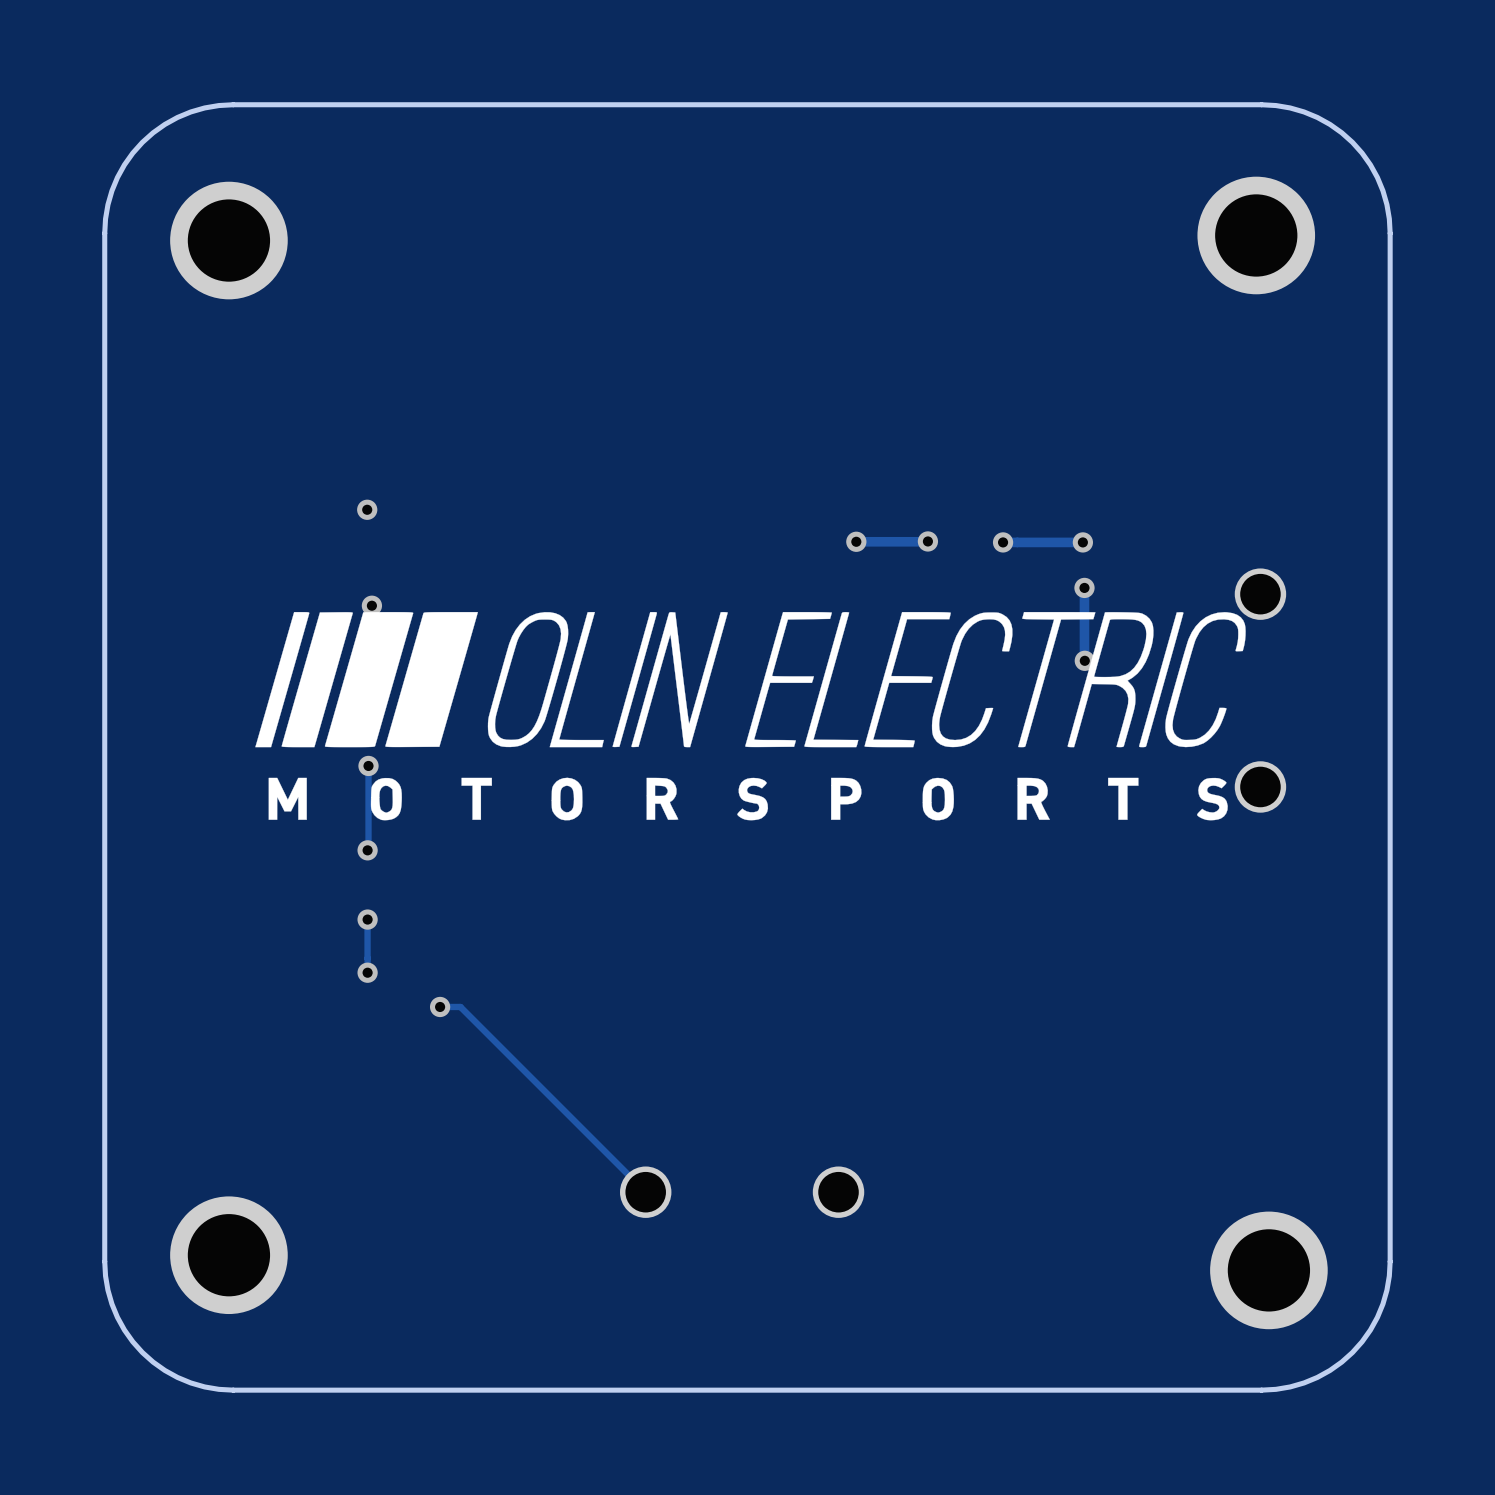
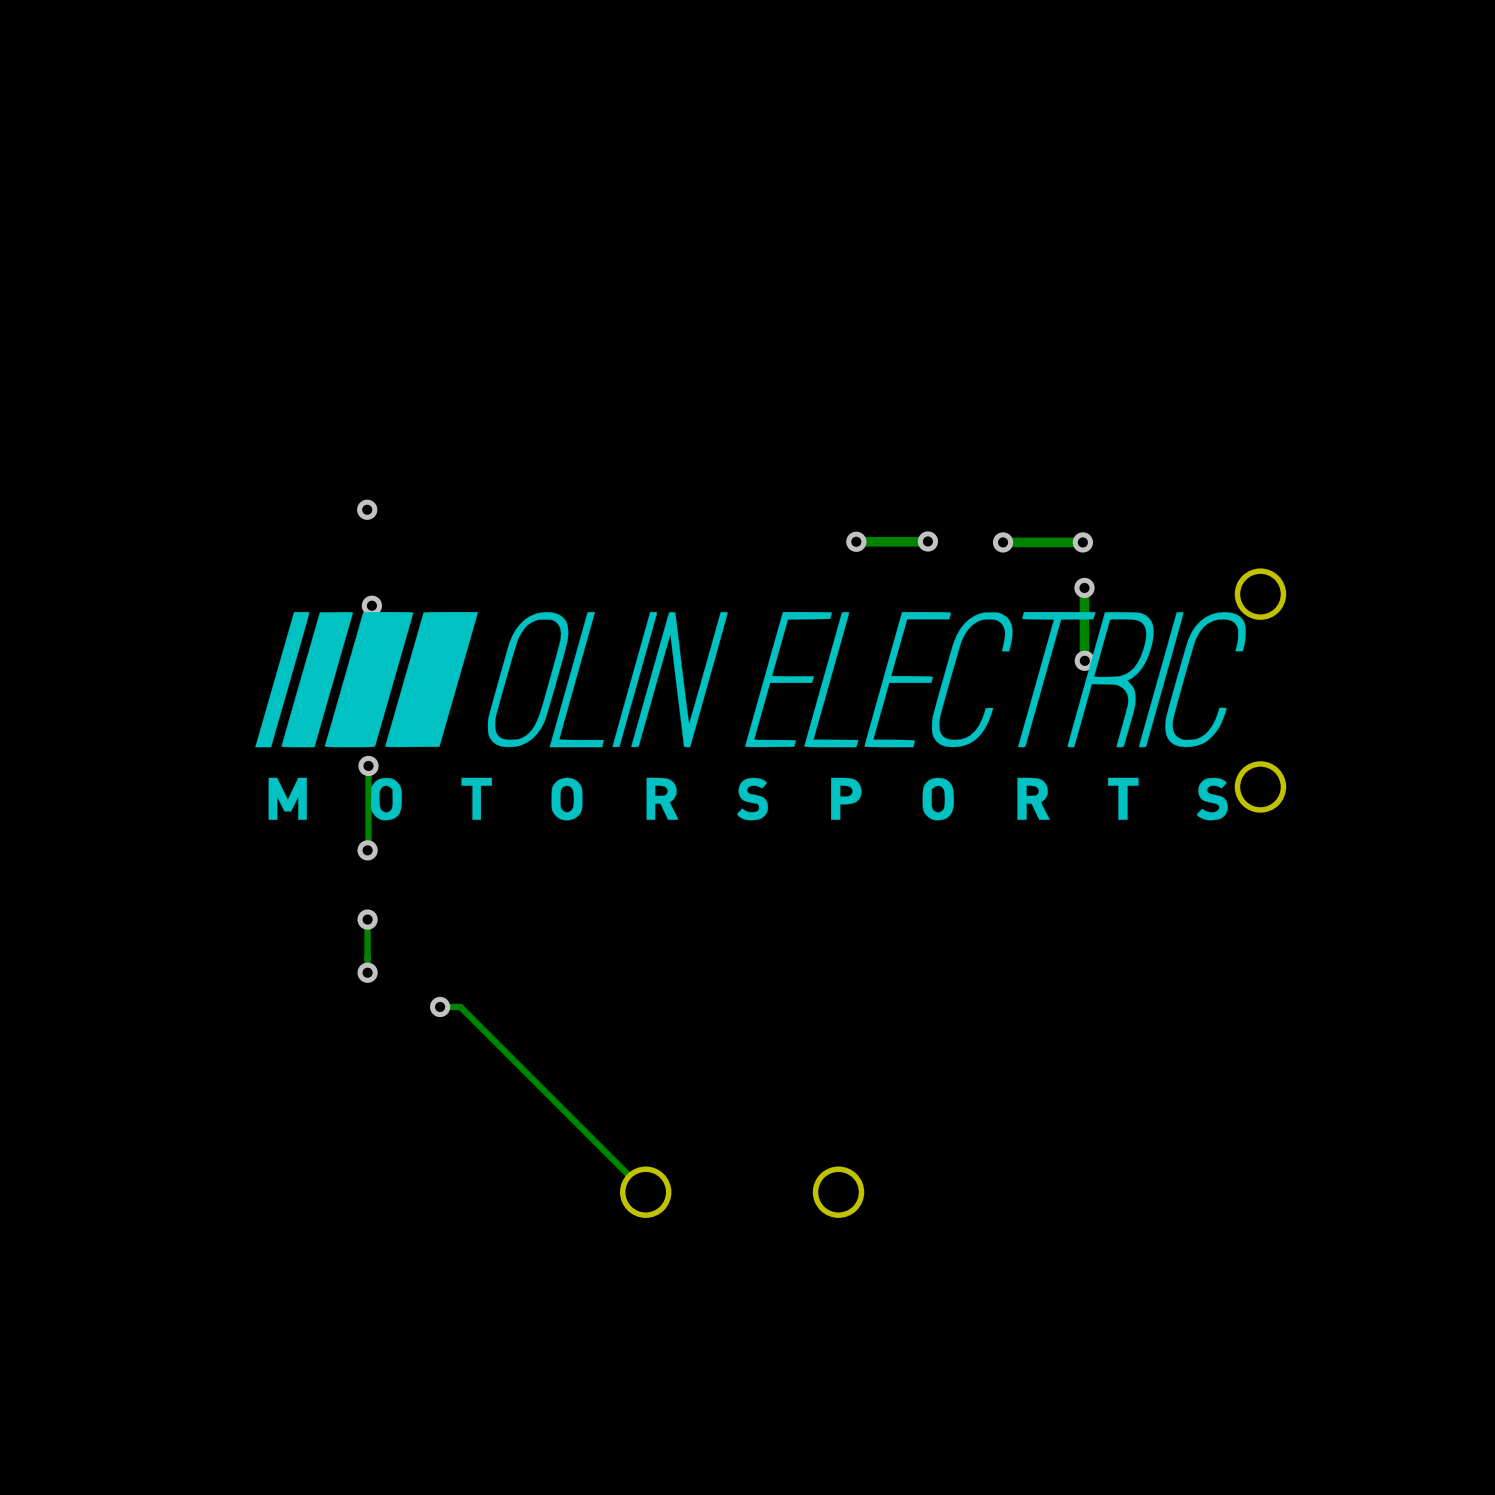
board edge: (1261, 104) (233, 104) (204, 107) (177, 117) (153, 132) (132, 153) (124, 164) (111, 190) (107, 204) (104, 233) (104, 1261) (107, 1290) (117, 1317) (132, 1341) (153, 1362) (177, 1377) (190, 1382) (204, 1386) (233, 1390) (1261, 1390) (1290, 1386) (1317, 1377) (1341, 1362) (1362, 1341) (1377, 1317) (1382, 1304) (1389, 1276) (1390, 1261) (1389, 218) (1382, 190) (1377, 177) (1362, 153) (1352, 142) (1330, 124) (1304, 111) (1290, 107) (1261, 104) -> none
part: (1256, 235) -> none
part: (228, 240) -> none
part: (228, 1255) -> none
part: (1268, 1270) -> none

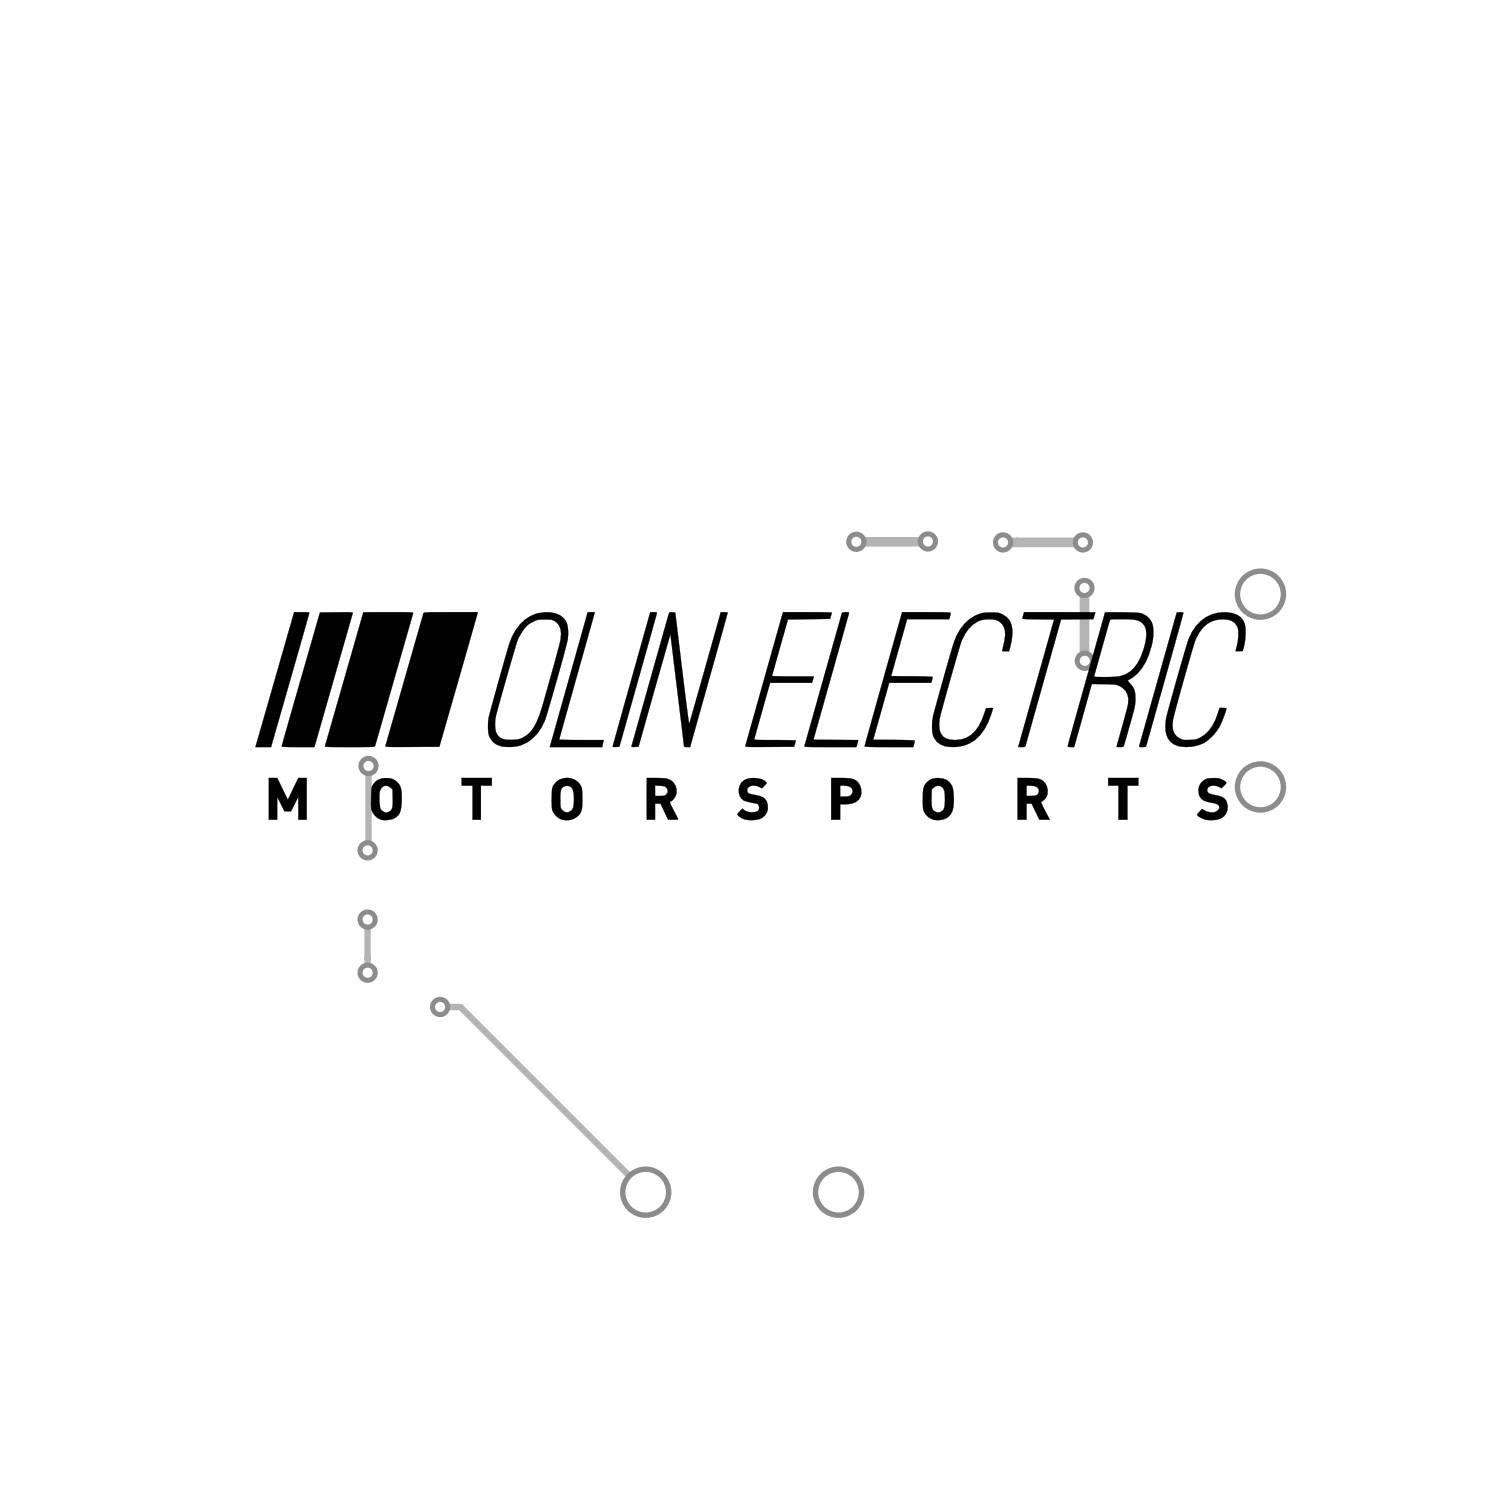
via: (367, 509) -> none
via: (371, 605) -> none

